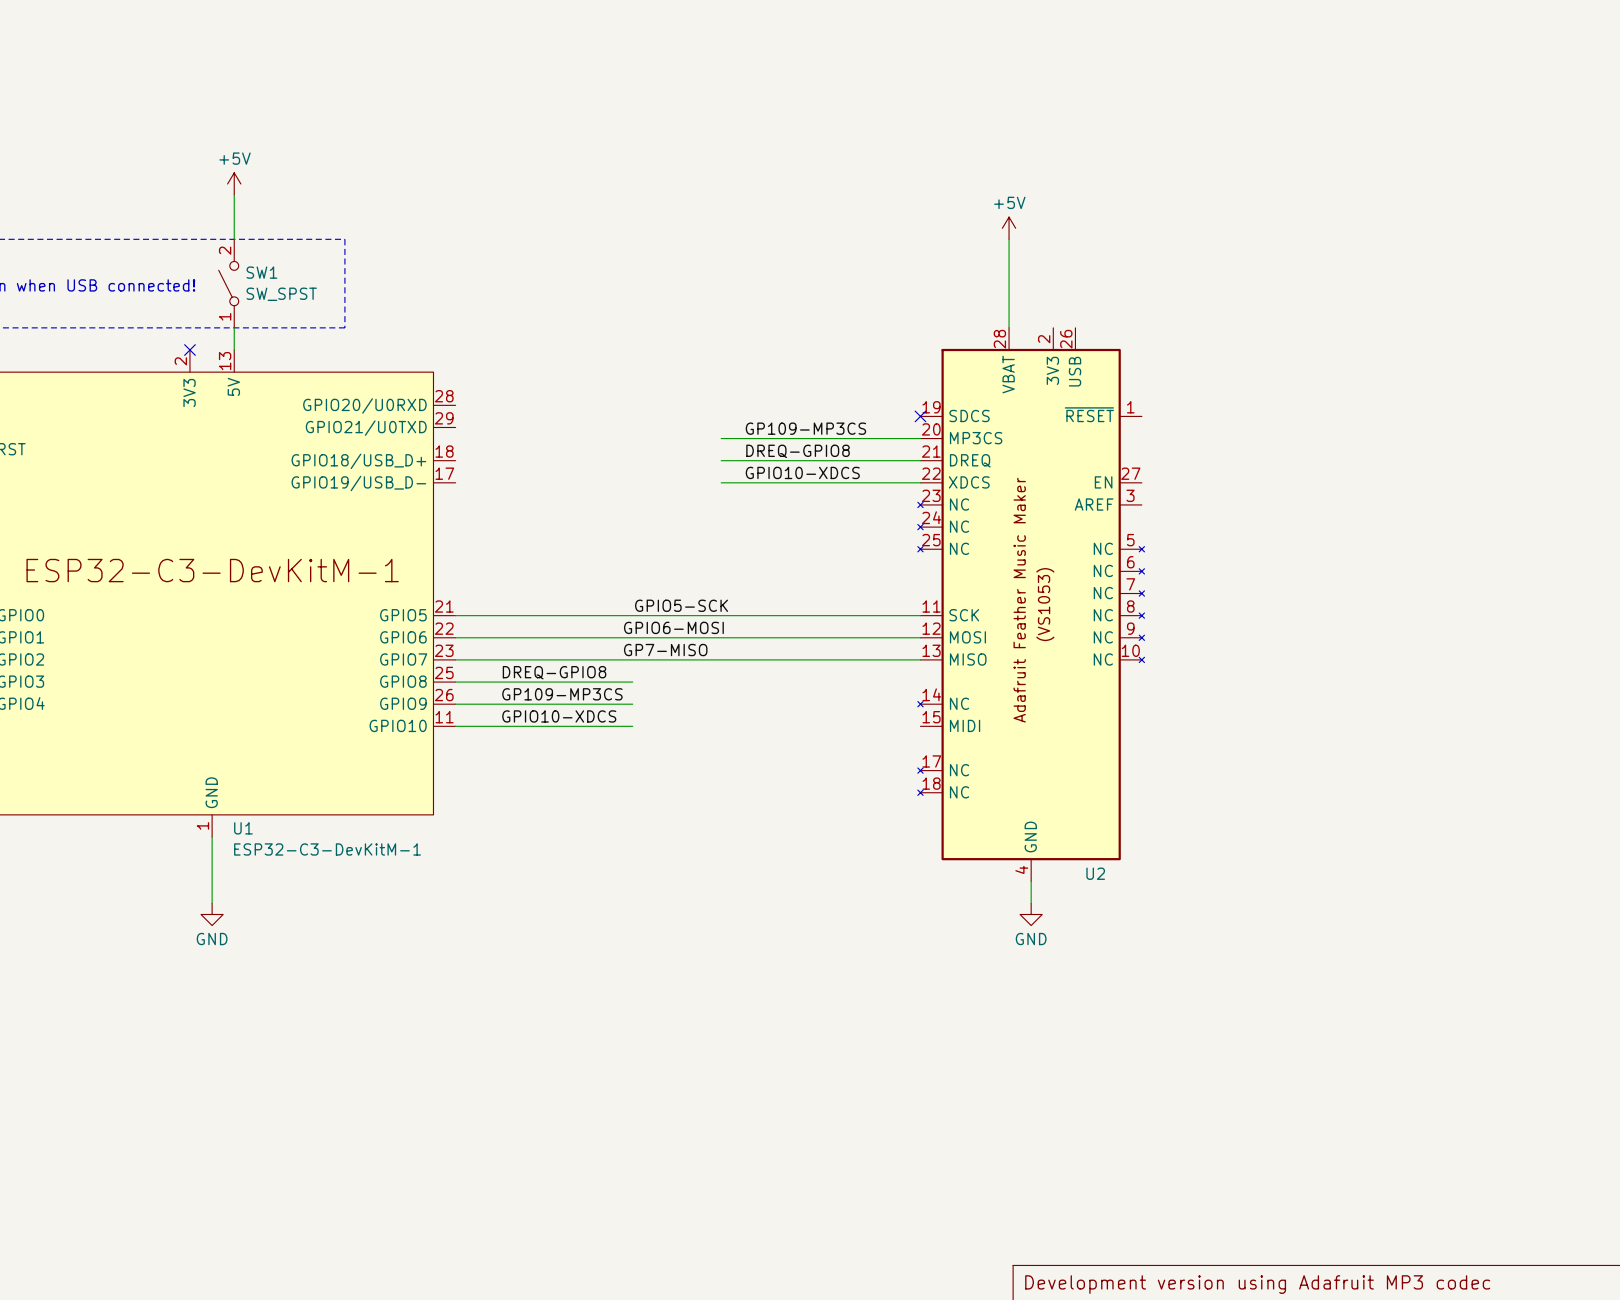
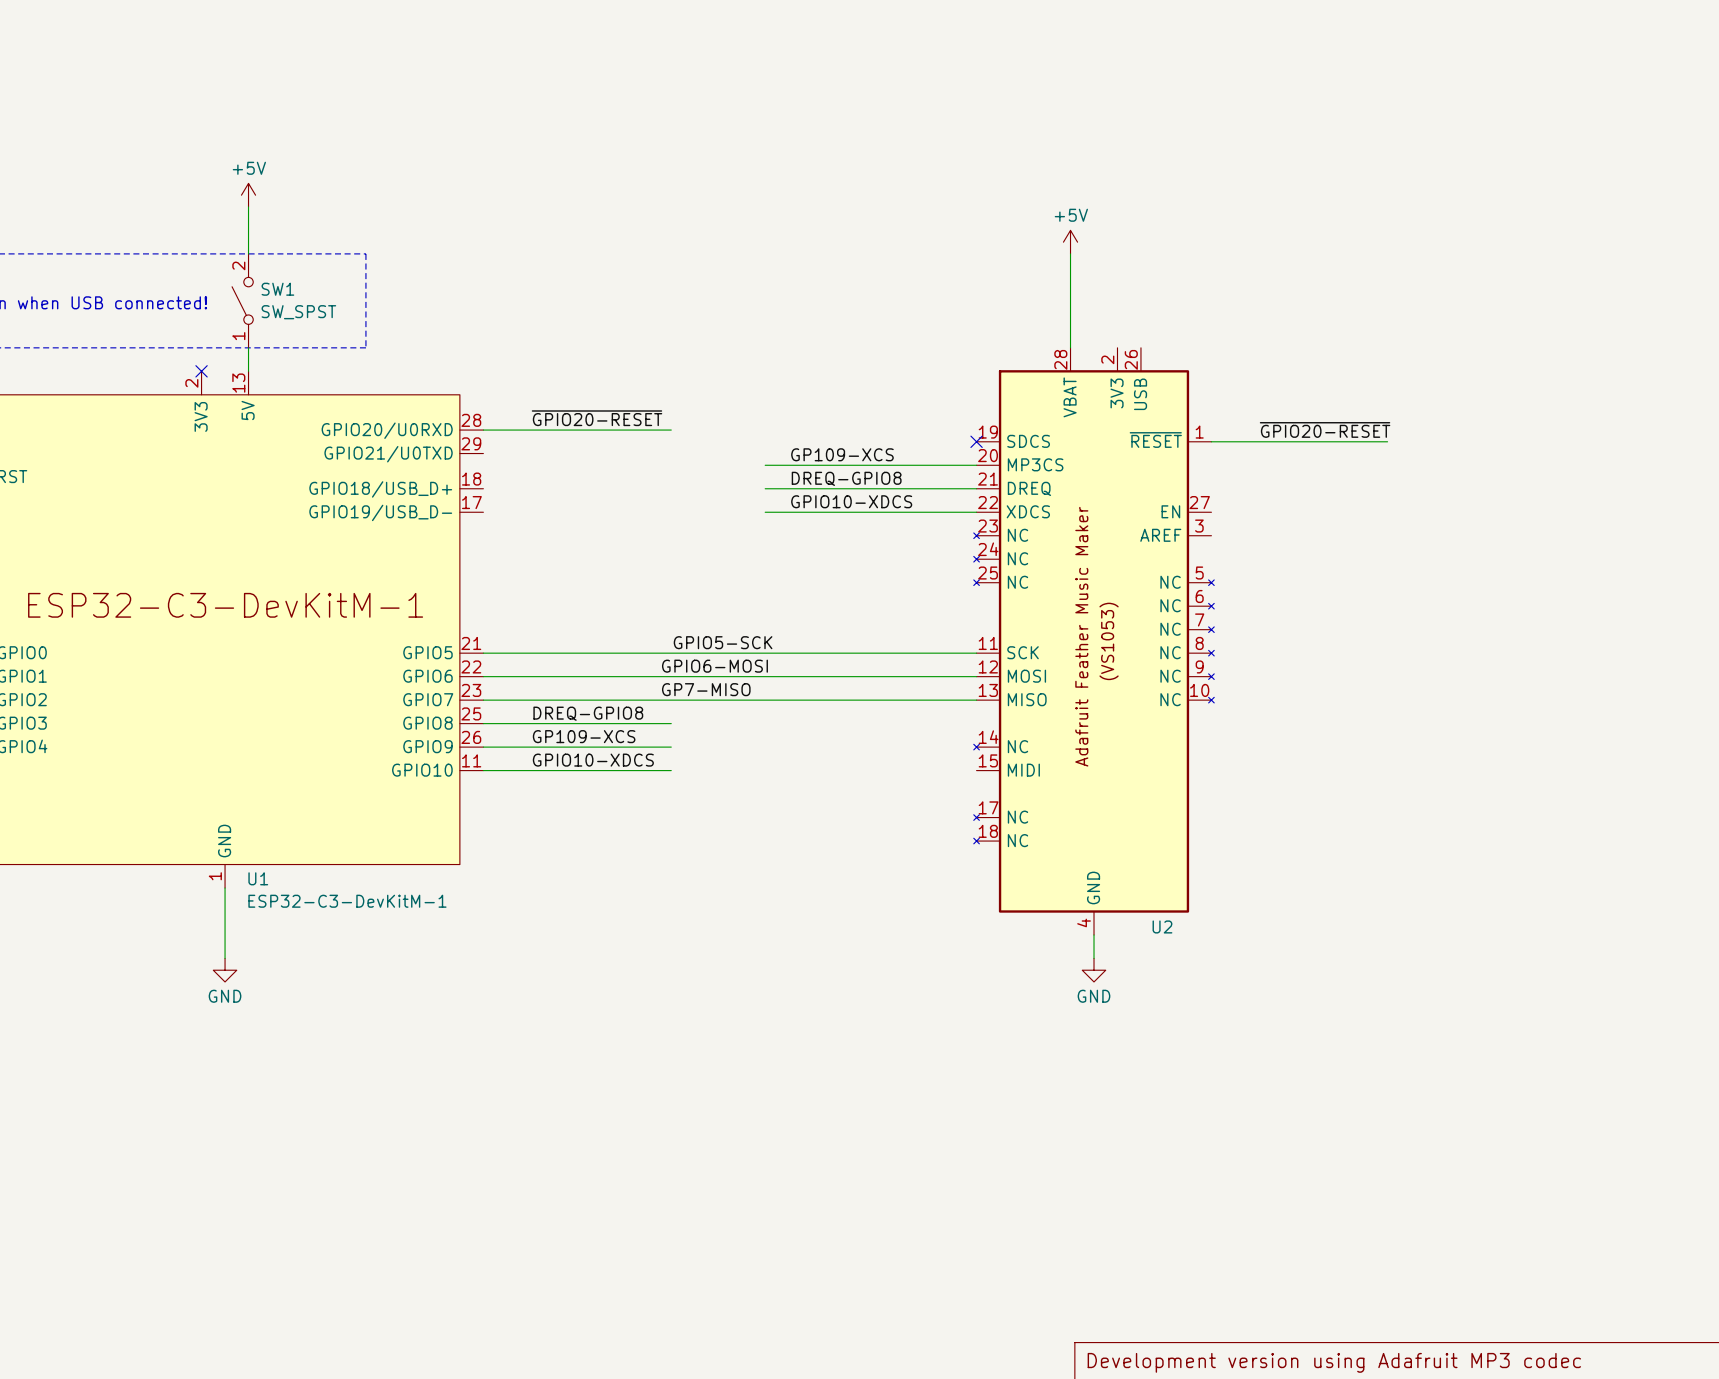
label: none -> ~{GPIO20-RESET} (597, 418)
wire: none -> (483, 430) (671, 430)
label: none -> ~{GPIO20-RESET} (1325, 429)
wire: none -> (1211, 441) (1387, 441)
label: GP109-MP3CS (805, 428) -> GP109-XCS (842, 454)
label: GP109-MP3CS (562, 694) -> GP109-XCS (584, 736)

